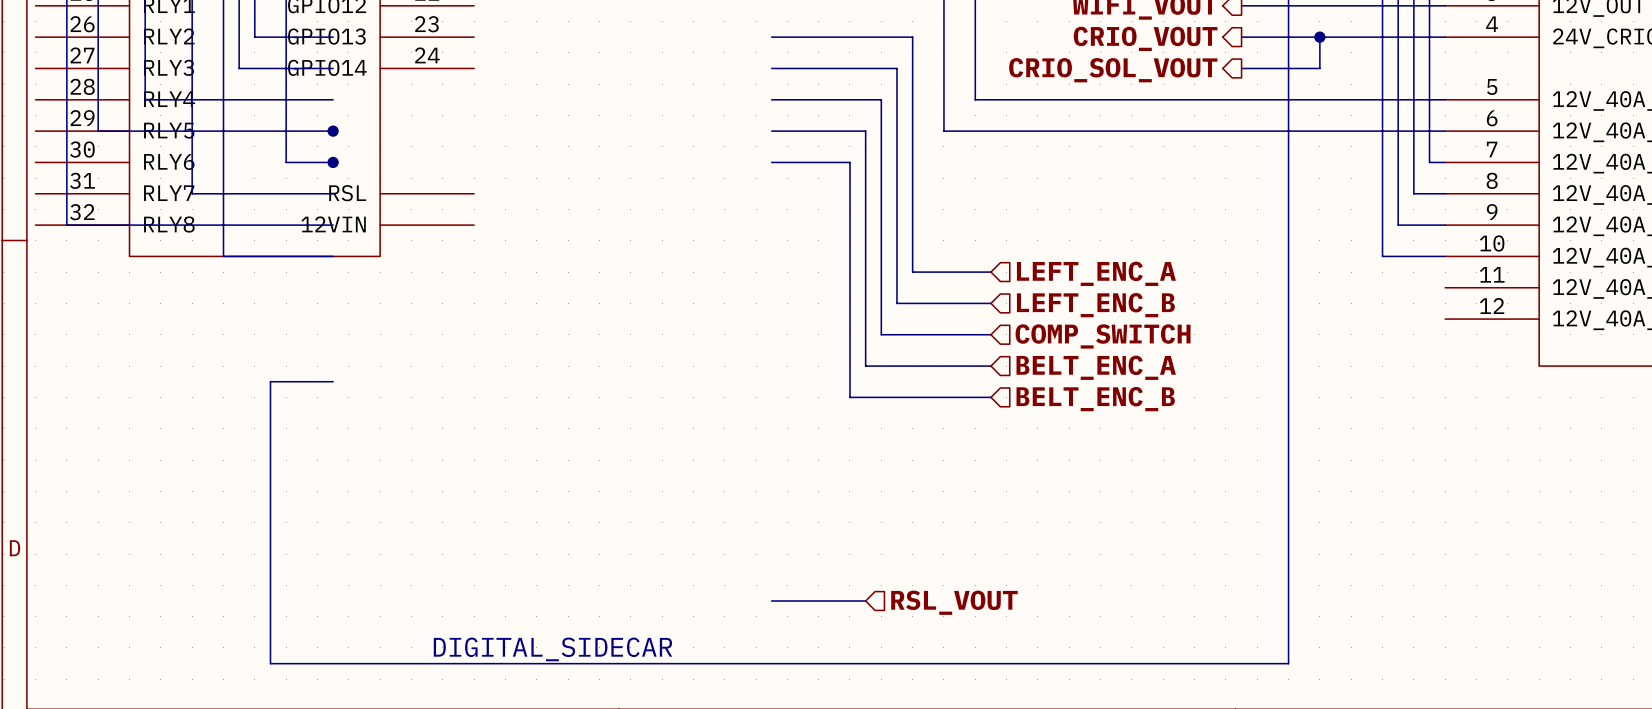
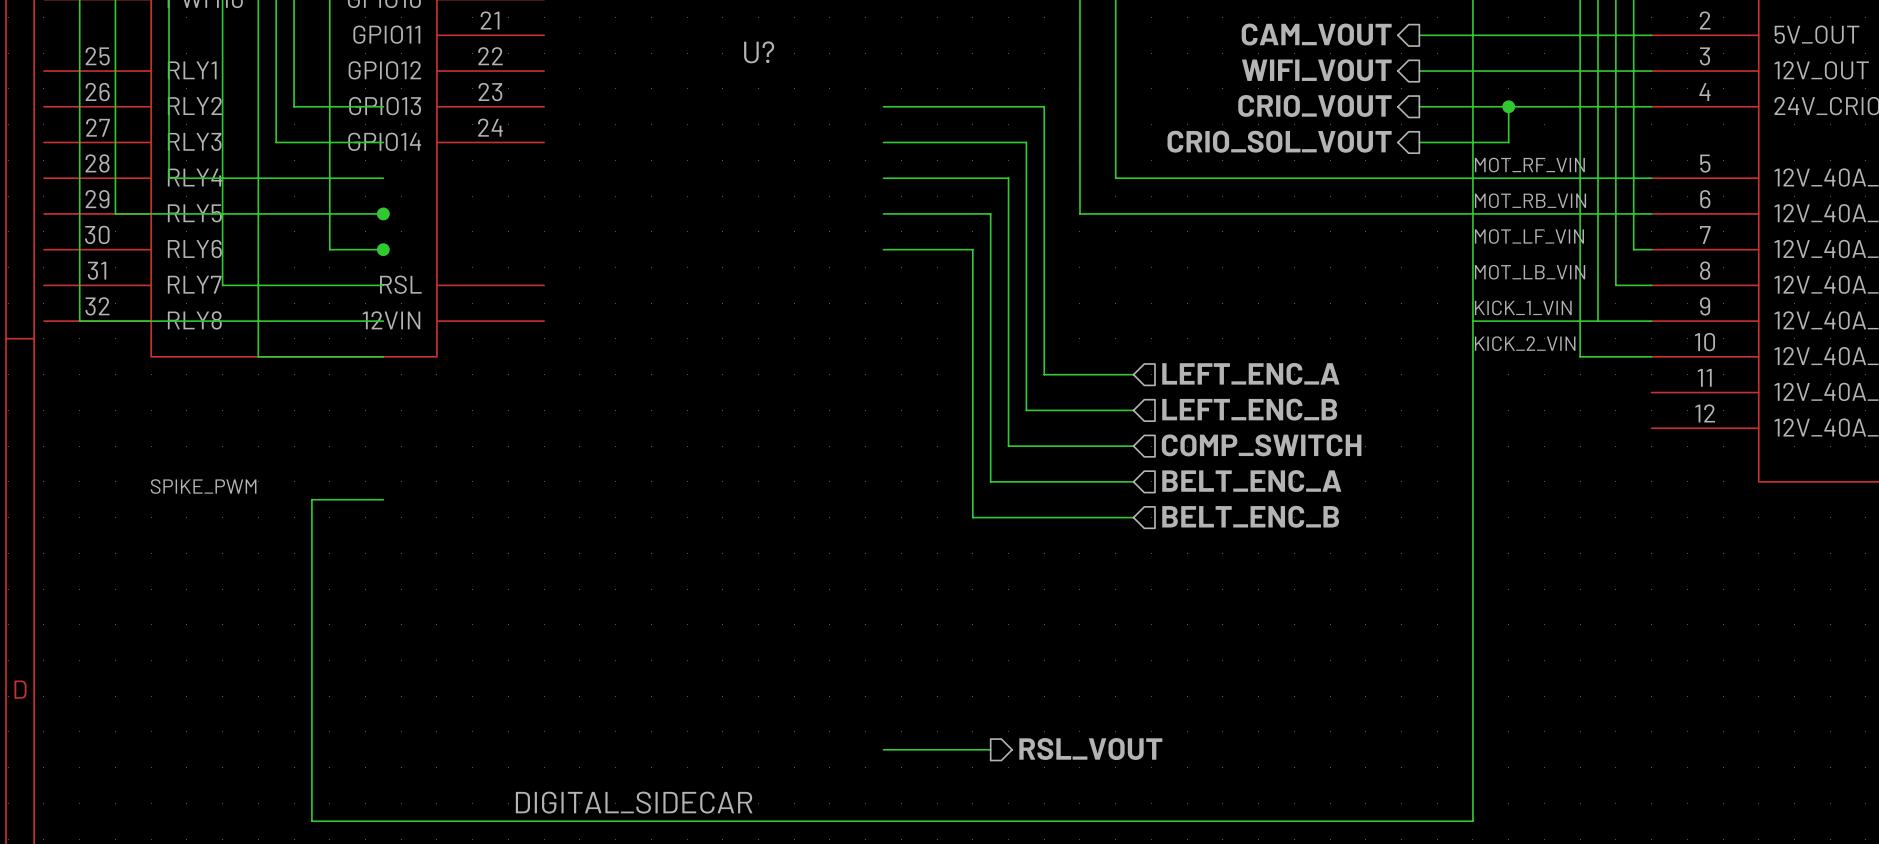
label: none -> MOT_RF_VIN (1529, 165)
label: none -> MOT_RB_VIN (1530, 200)
label: none -> MOT_LF_VIN (1529, 236)
label: none -> MOT_LB_VIN (1530, 272)
label: none -> KICK_1_VIN (1523, 307)
wire: none -> (1472, 321) (1597, 321)
label: none -> KICK_2_VIN (1525, 343)
label: none -> SPIKE_PWM (203, 486)
hierarchical label shape: input (954, 602) -> output (1090, 749)

